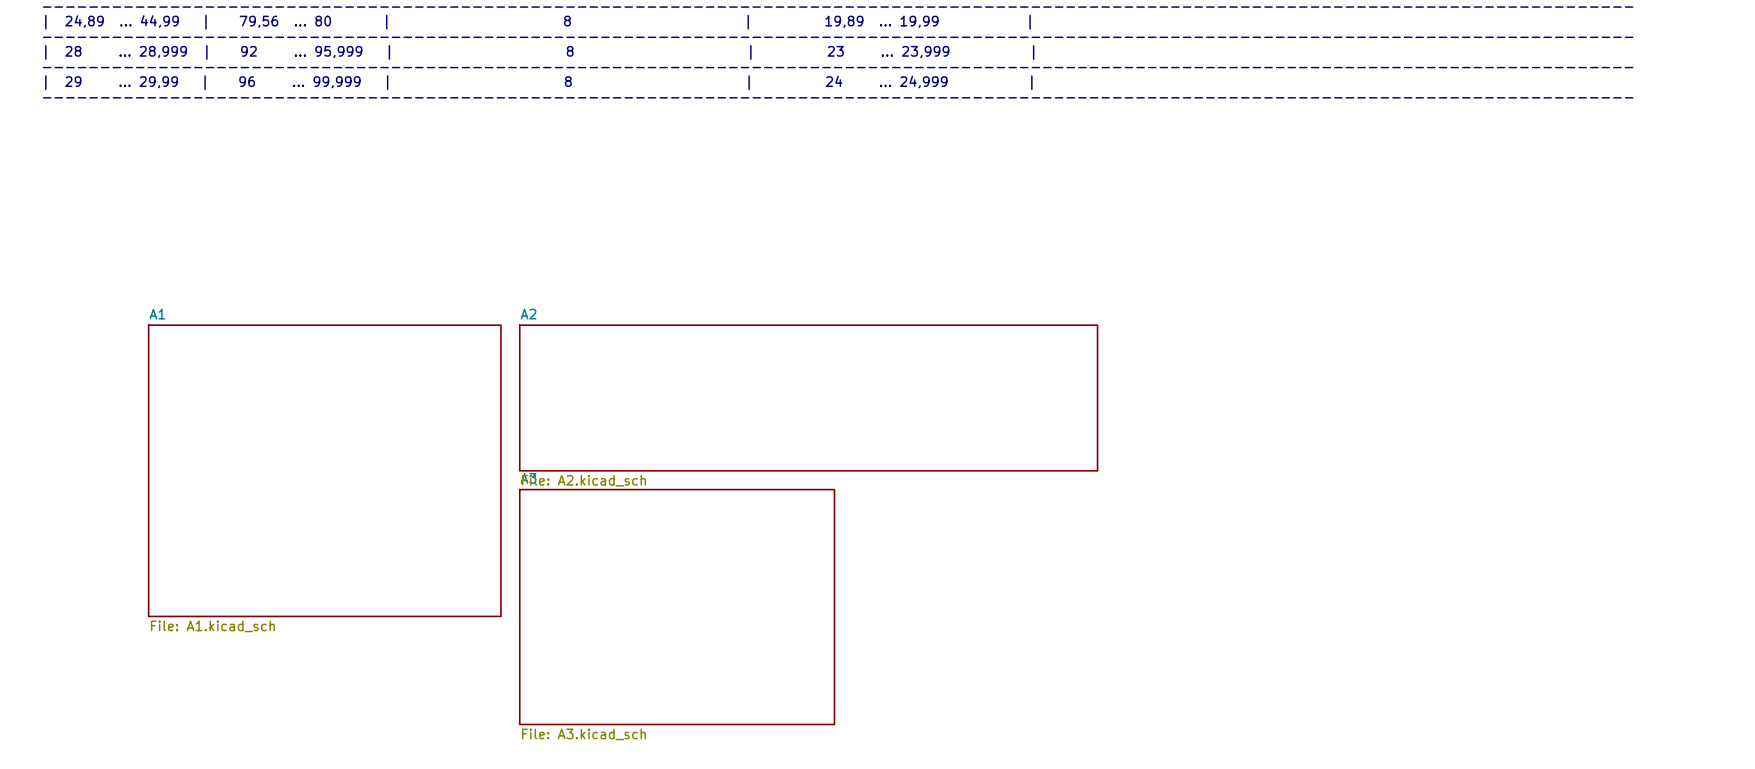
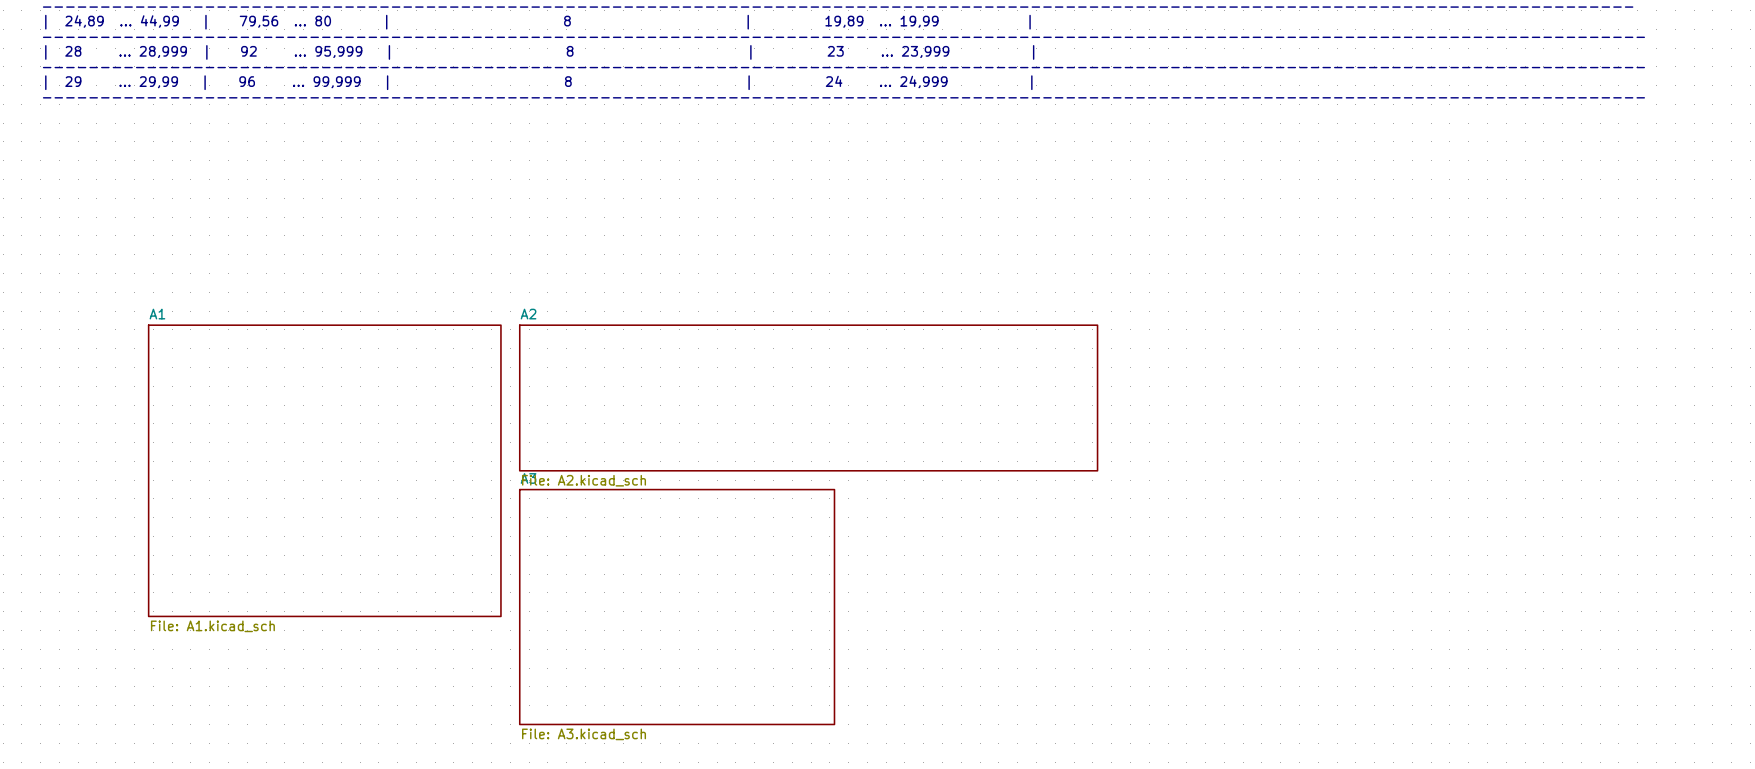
text: ----------------------------------------------------------------------------------------------------------------------------------------- (838, 37) -> ------------------------------------------------------------------------------------------------------------------------------------------ (843, 37)
text: ----------------------------------------------------------------------------------------------------------------------------------------- (838, 67) -> ------------------------------------------------------------------------------------------------------------------------------------------ (843, 67)
text: ----------------------------------------------------------------------------------------------------------------------------------------- (838, 97) -> ------------------------------------------------------------------------------------------------------------------------------------------ (843, 97)

